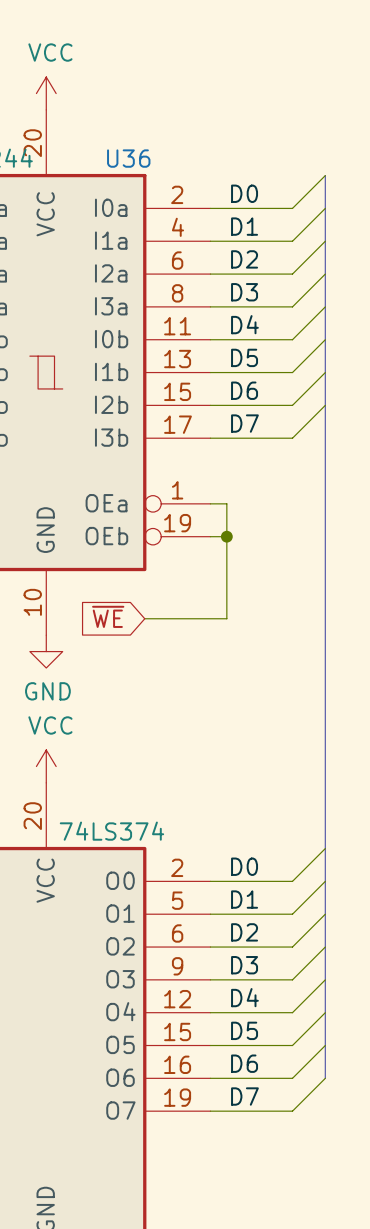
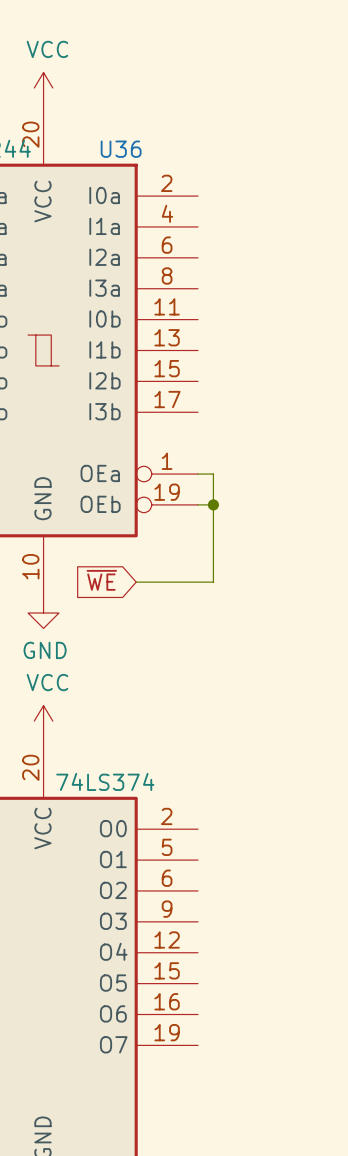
wire: (325, 175) (292, 208) (210, 208) -> none
bus: (325, 175) (325, 1078) -> none
label: D0 (244, 193) -> none
wire: (325, 208) (292, 241) (210, 241) -> none
label: D1 (244, 226) -> none
wire: (325, 241) (292, 274) (210, 274) -> none
label: D2 (244, 259) -> none
wire: (325, 274) (292, 306) (210, 306) -> none
label: D3 (244, 292) -> none
wire: (325, 306) (292, 339) (210, 339) -> none
label: D4 (244, 324) -> none
wire: (325, 339) (292, 372) (210, 372) -> none
label: D5 (244, 357) -> none
wire: (325, 372) (292, 405) (210, 405) -> none
label: D6 (244, 390) -> none
wire: (325, 405) (292, 438) (210, 438) -> none
label: D7 (244, 423) -> none
wire: (325, 848) (292, 881) (210, 881) -> none
label: D0 (244, 866) -> none
wire: (325, 881) (292, 914) (210, 914) -> none
label: D1 (244, 899) -> none
wire: (325, 914) (292, 947) (210, 947) -> none
label: D2 (244, 932) -> none
wire: (325, 947) (292, 979) (210, 979) -> none
label: D3 (244, 965) -> none
wire: (325, 979) (292, 1012) (210, 1012) -> none
label: D4 (244, 997) -> none
wire: (325, 1012) (292, 1045) (210, 1045) -> none
label: D5 (244, 1030) -> none
wire: (325, 1045) (292, 1078) (210, 1078) -> none
label: D6 (244, 1063) -> none
wire: (325, 1078) (292, 1111) (210, 1111) -> none
label: D7 (244, 1096) -> none

